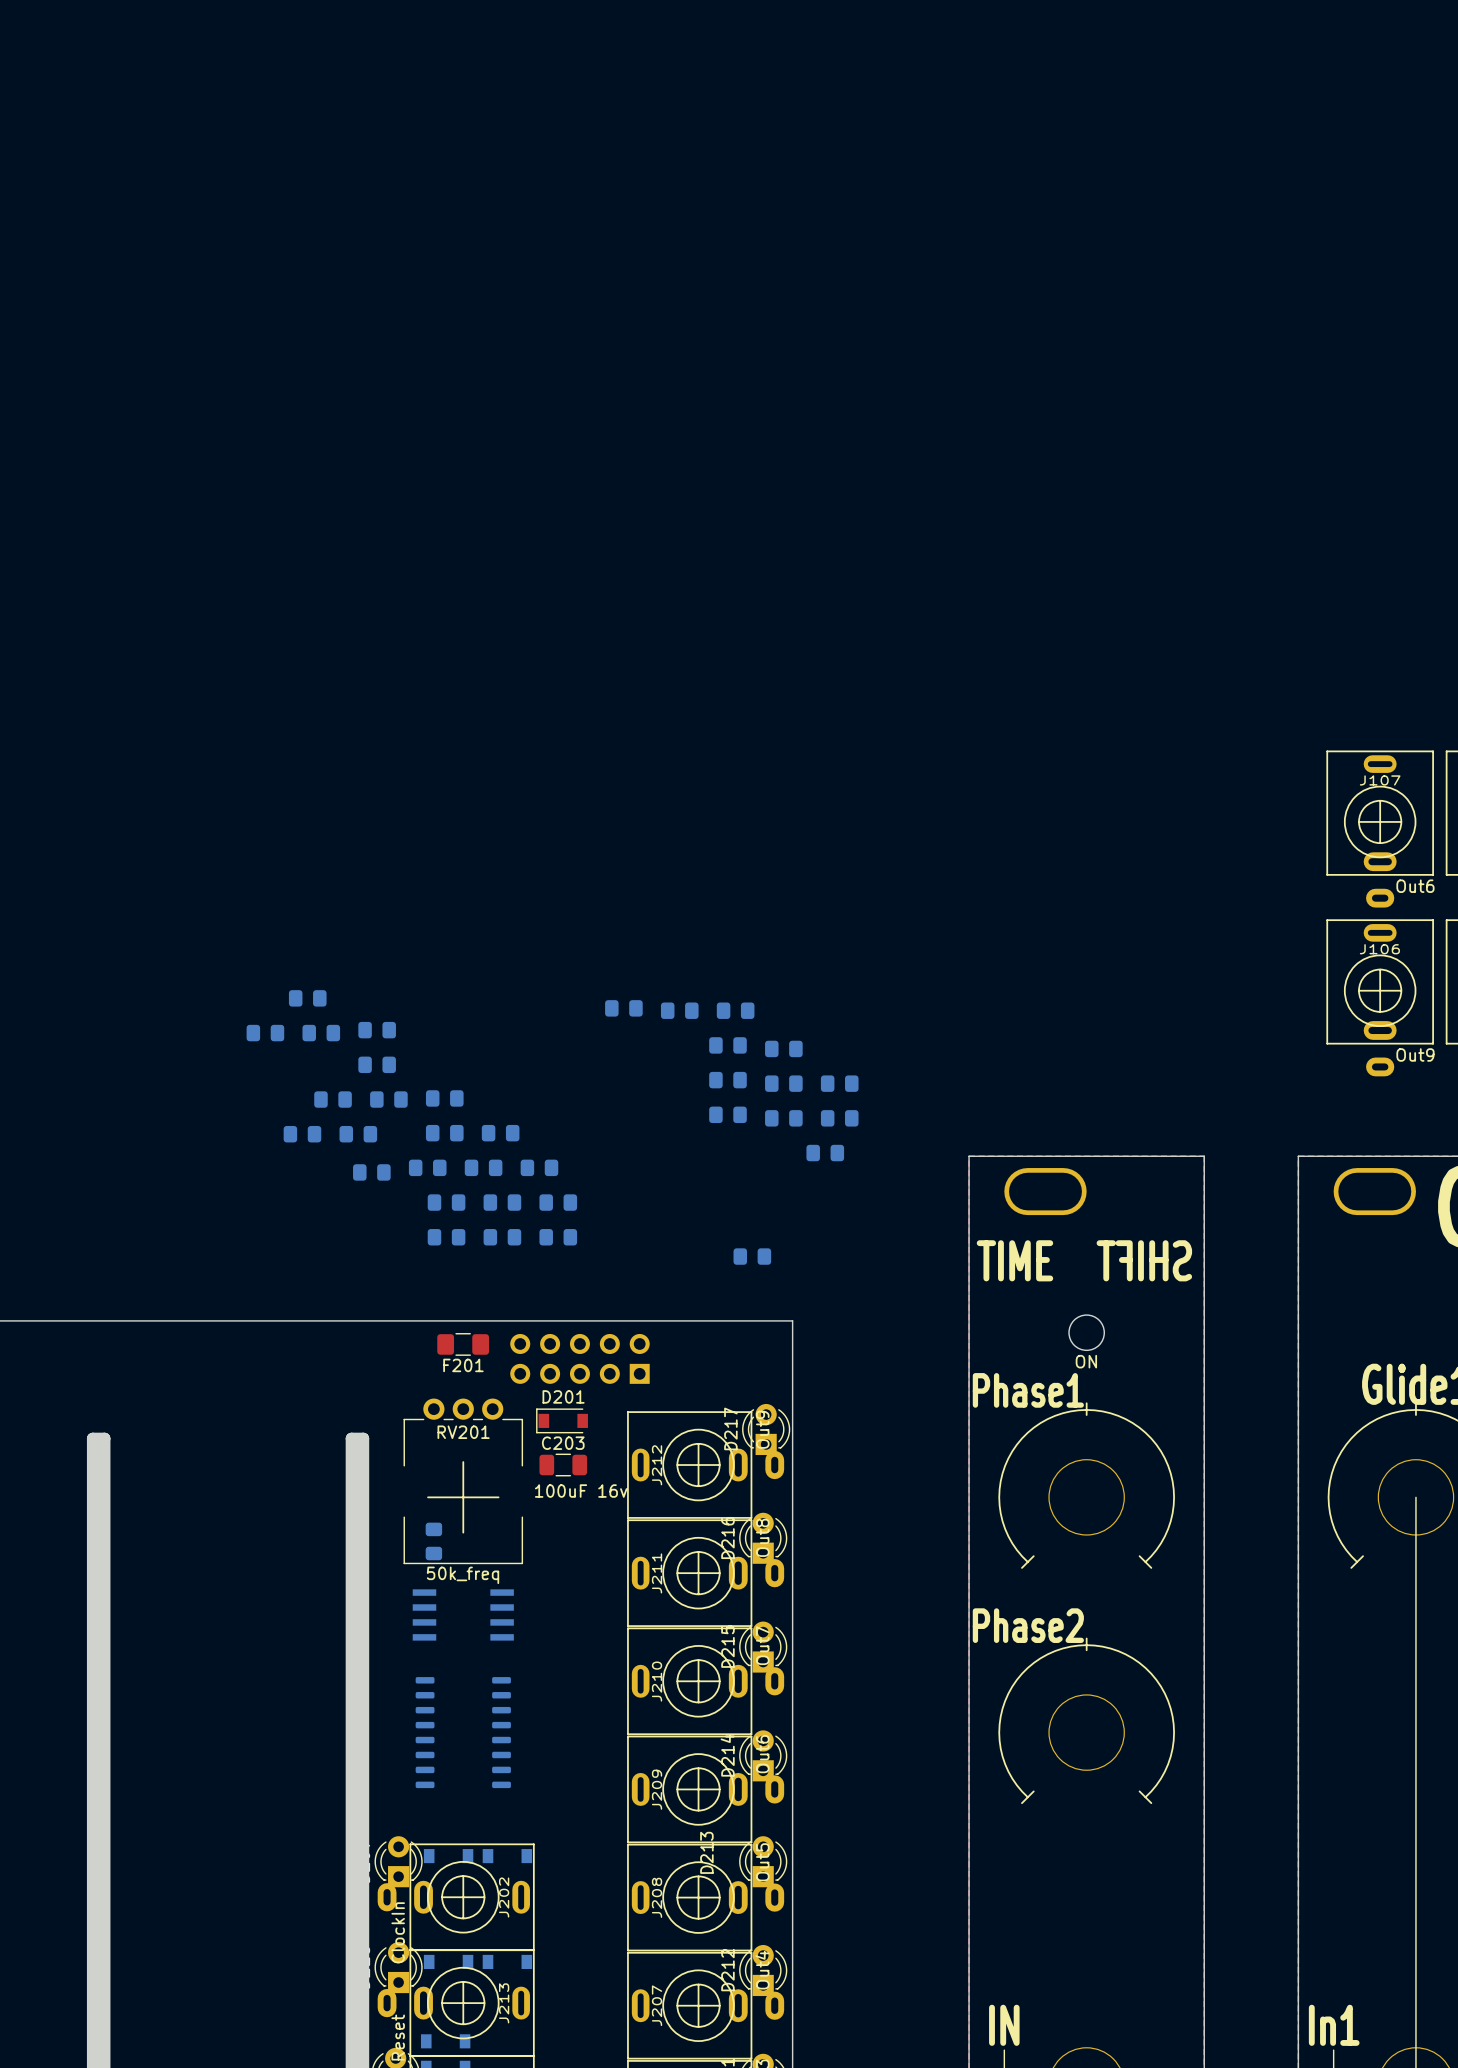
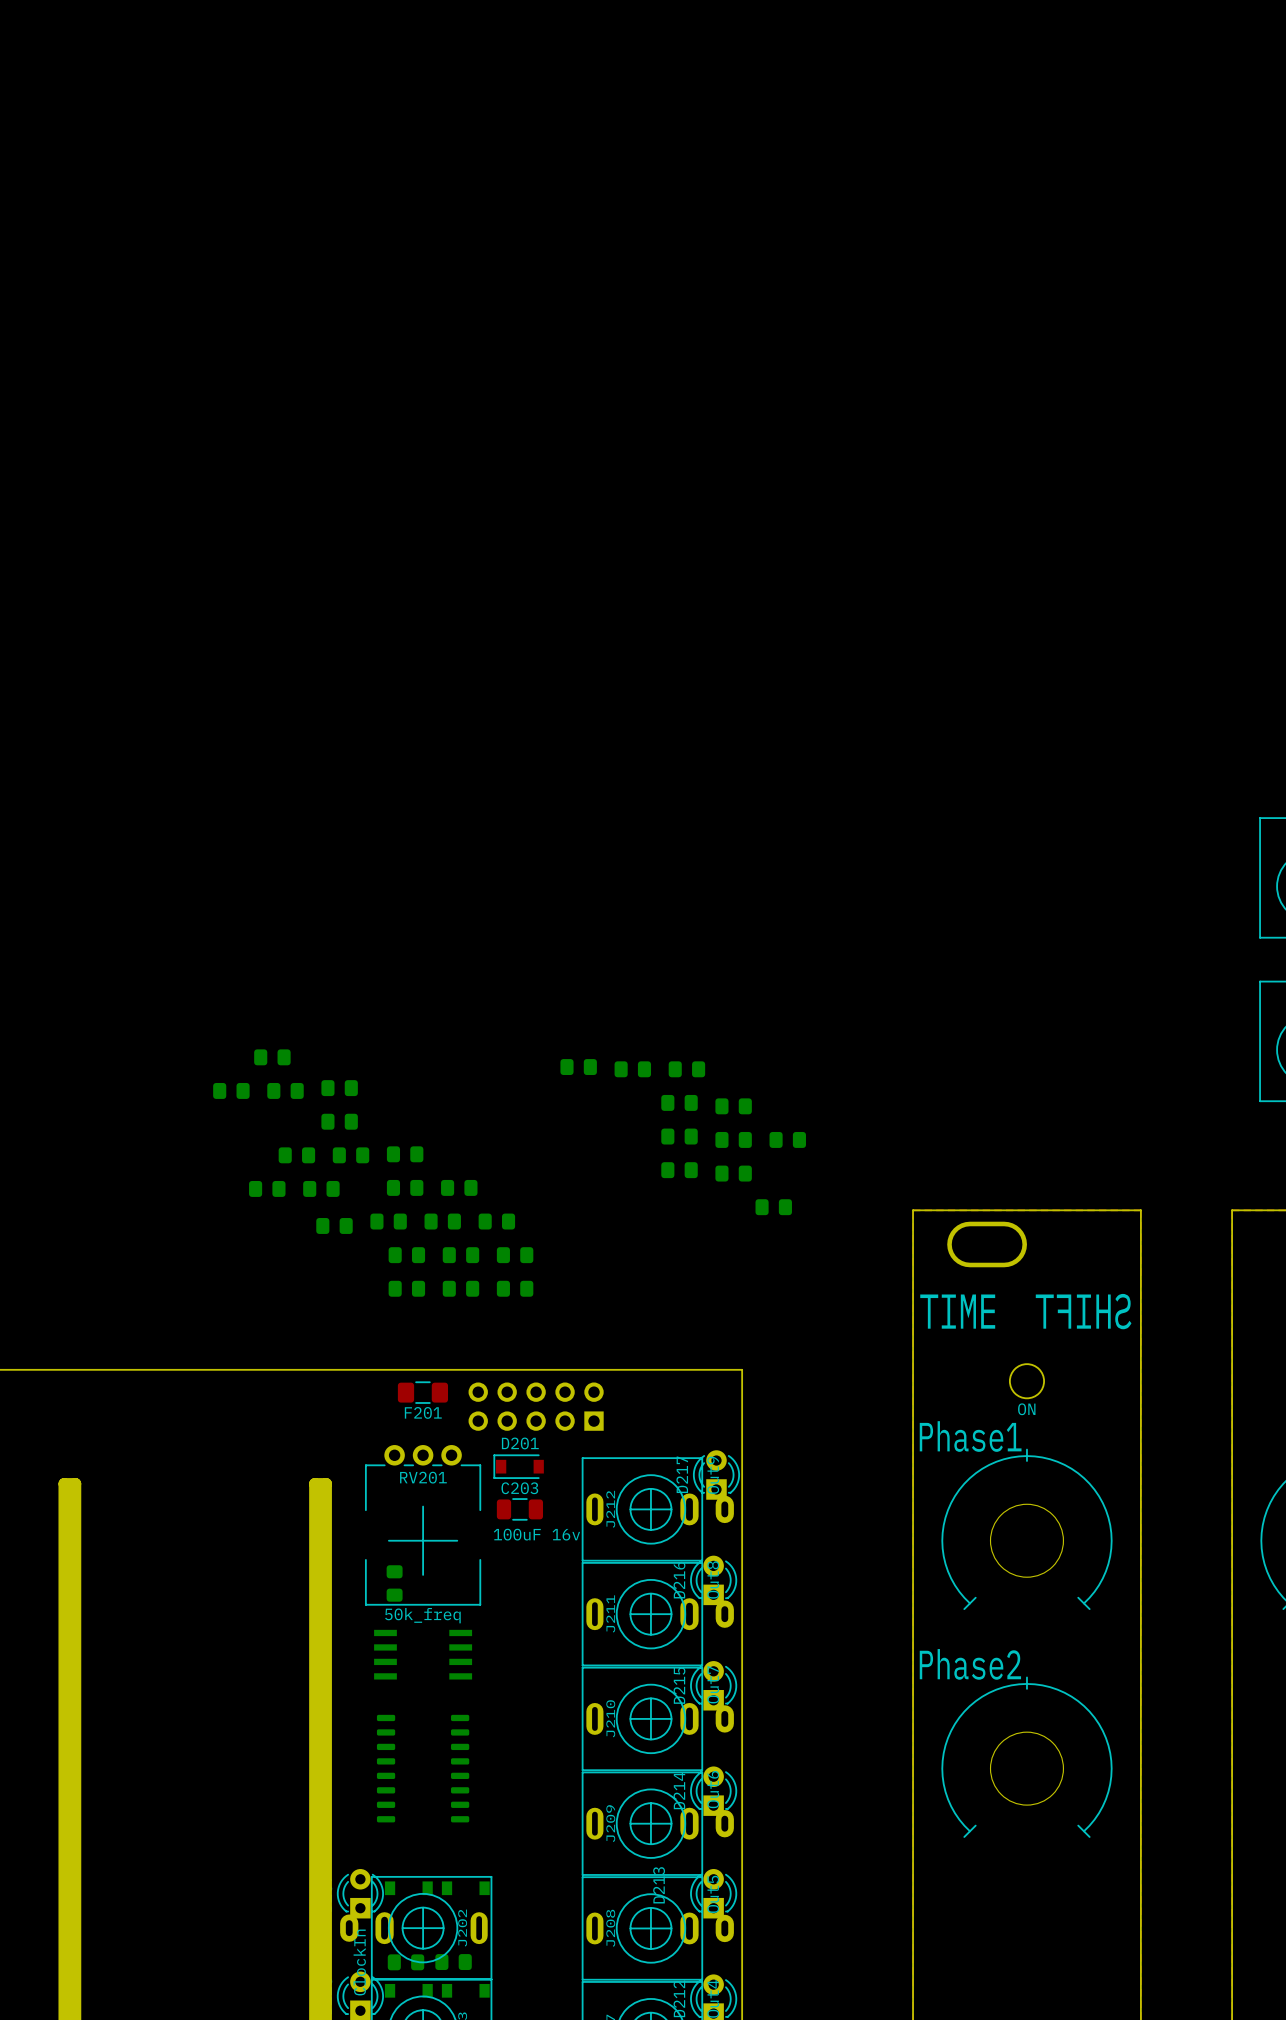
part: (839, 1118) -> none
part: (752, 1256) -> none
part: none -> (405, 1962)
part: none -> (453, 1962)

